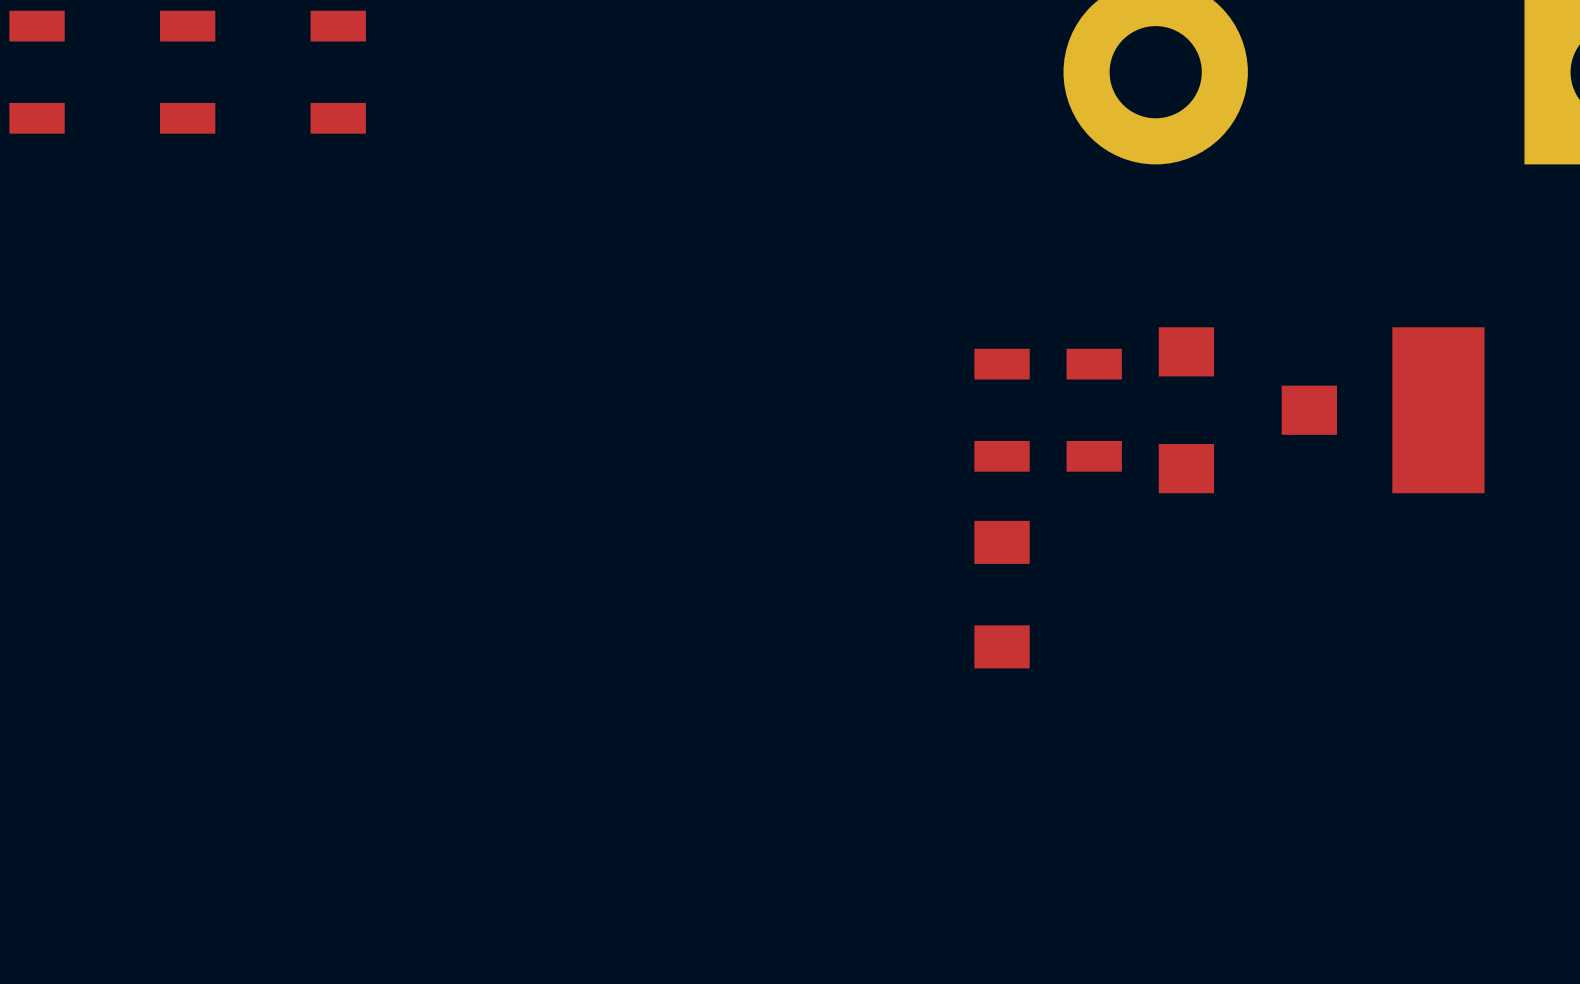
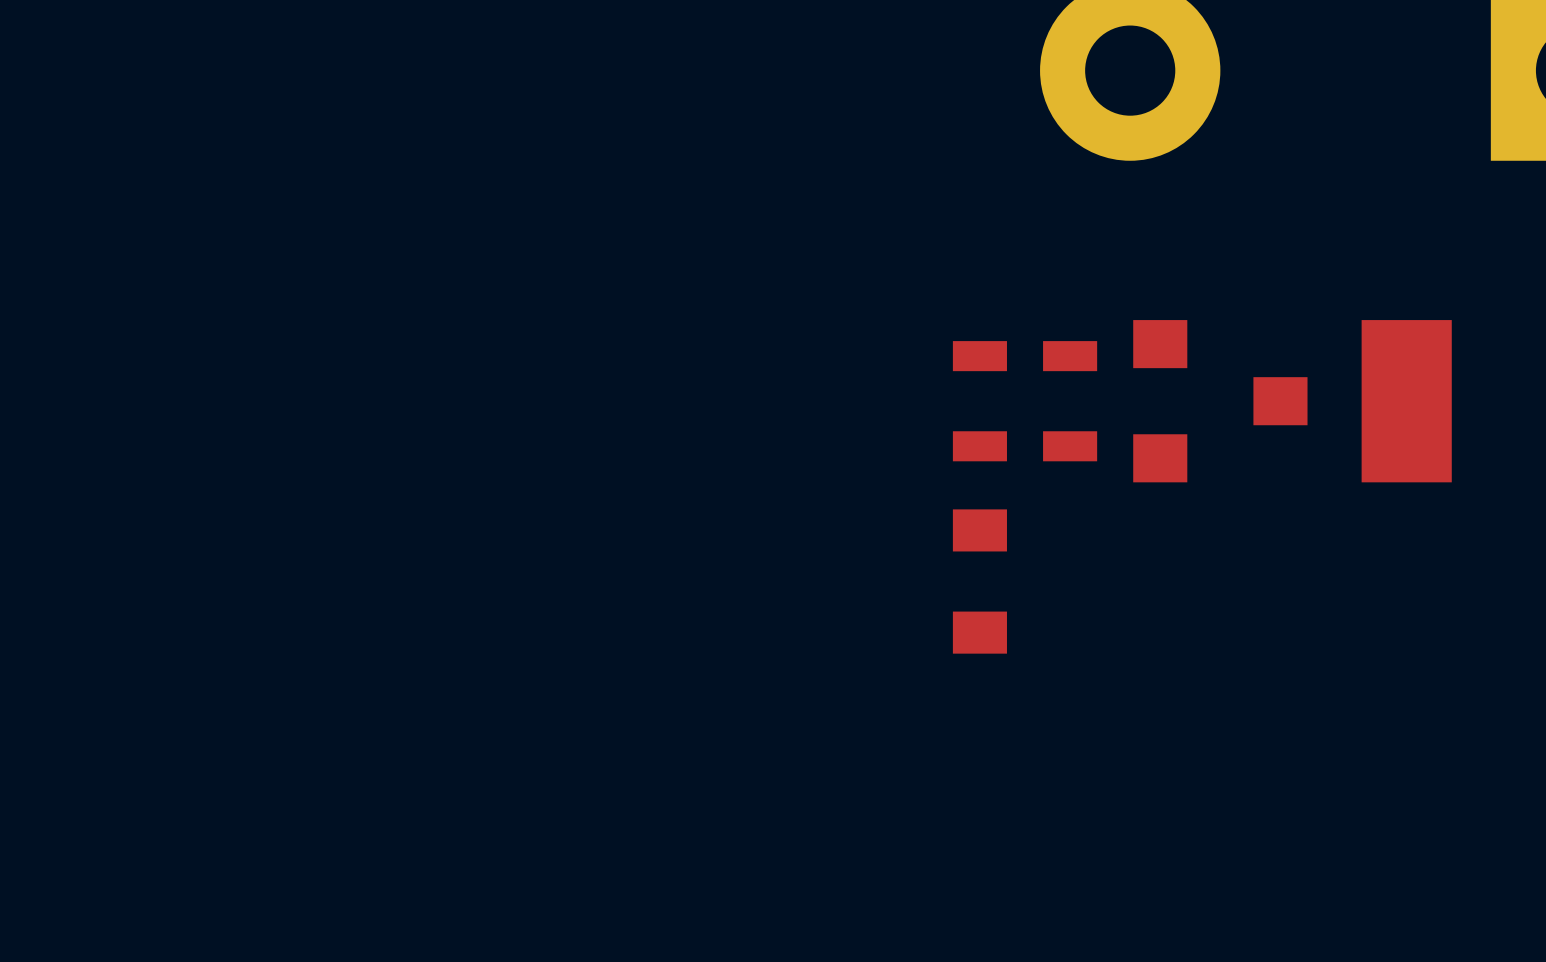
part: (37, 72) -> none
part: (187, 72) -> none
part: (338, 72) -> none

